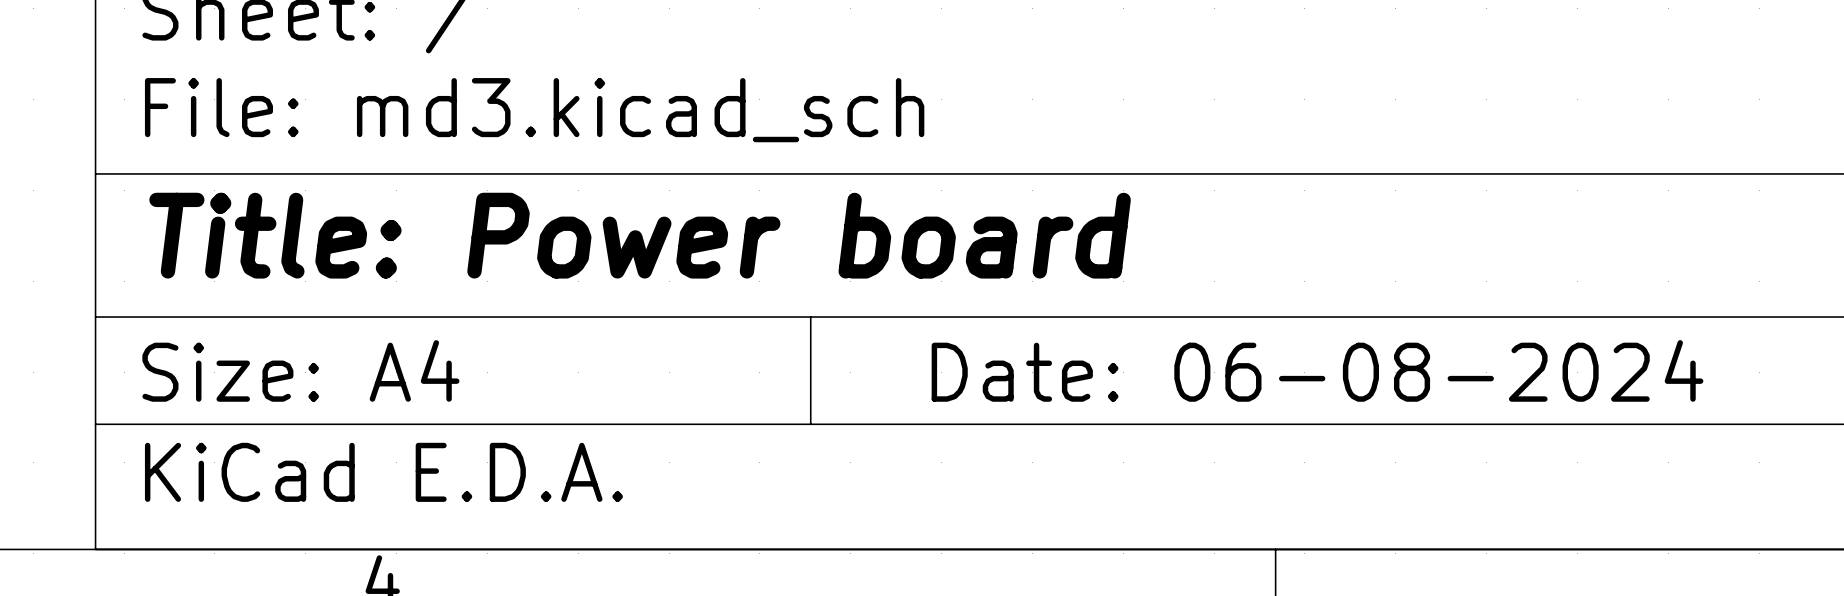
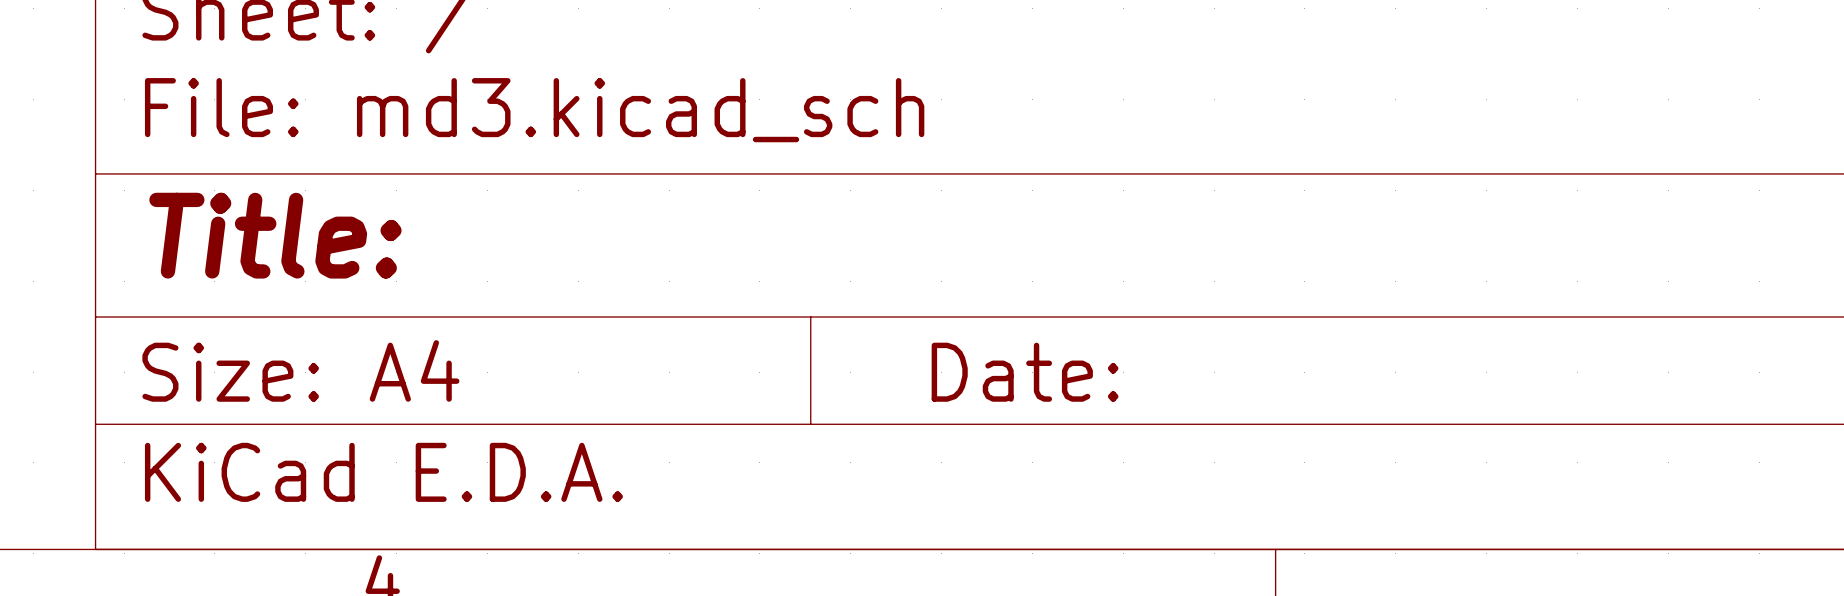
title block: Title: Power board (640, 235) -> Title: (275, 235)
title block: Date: 06-08-2024 (1317, 370) -> Date: (1025, 372)

